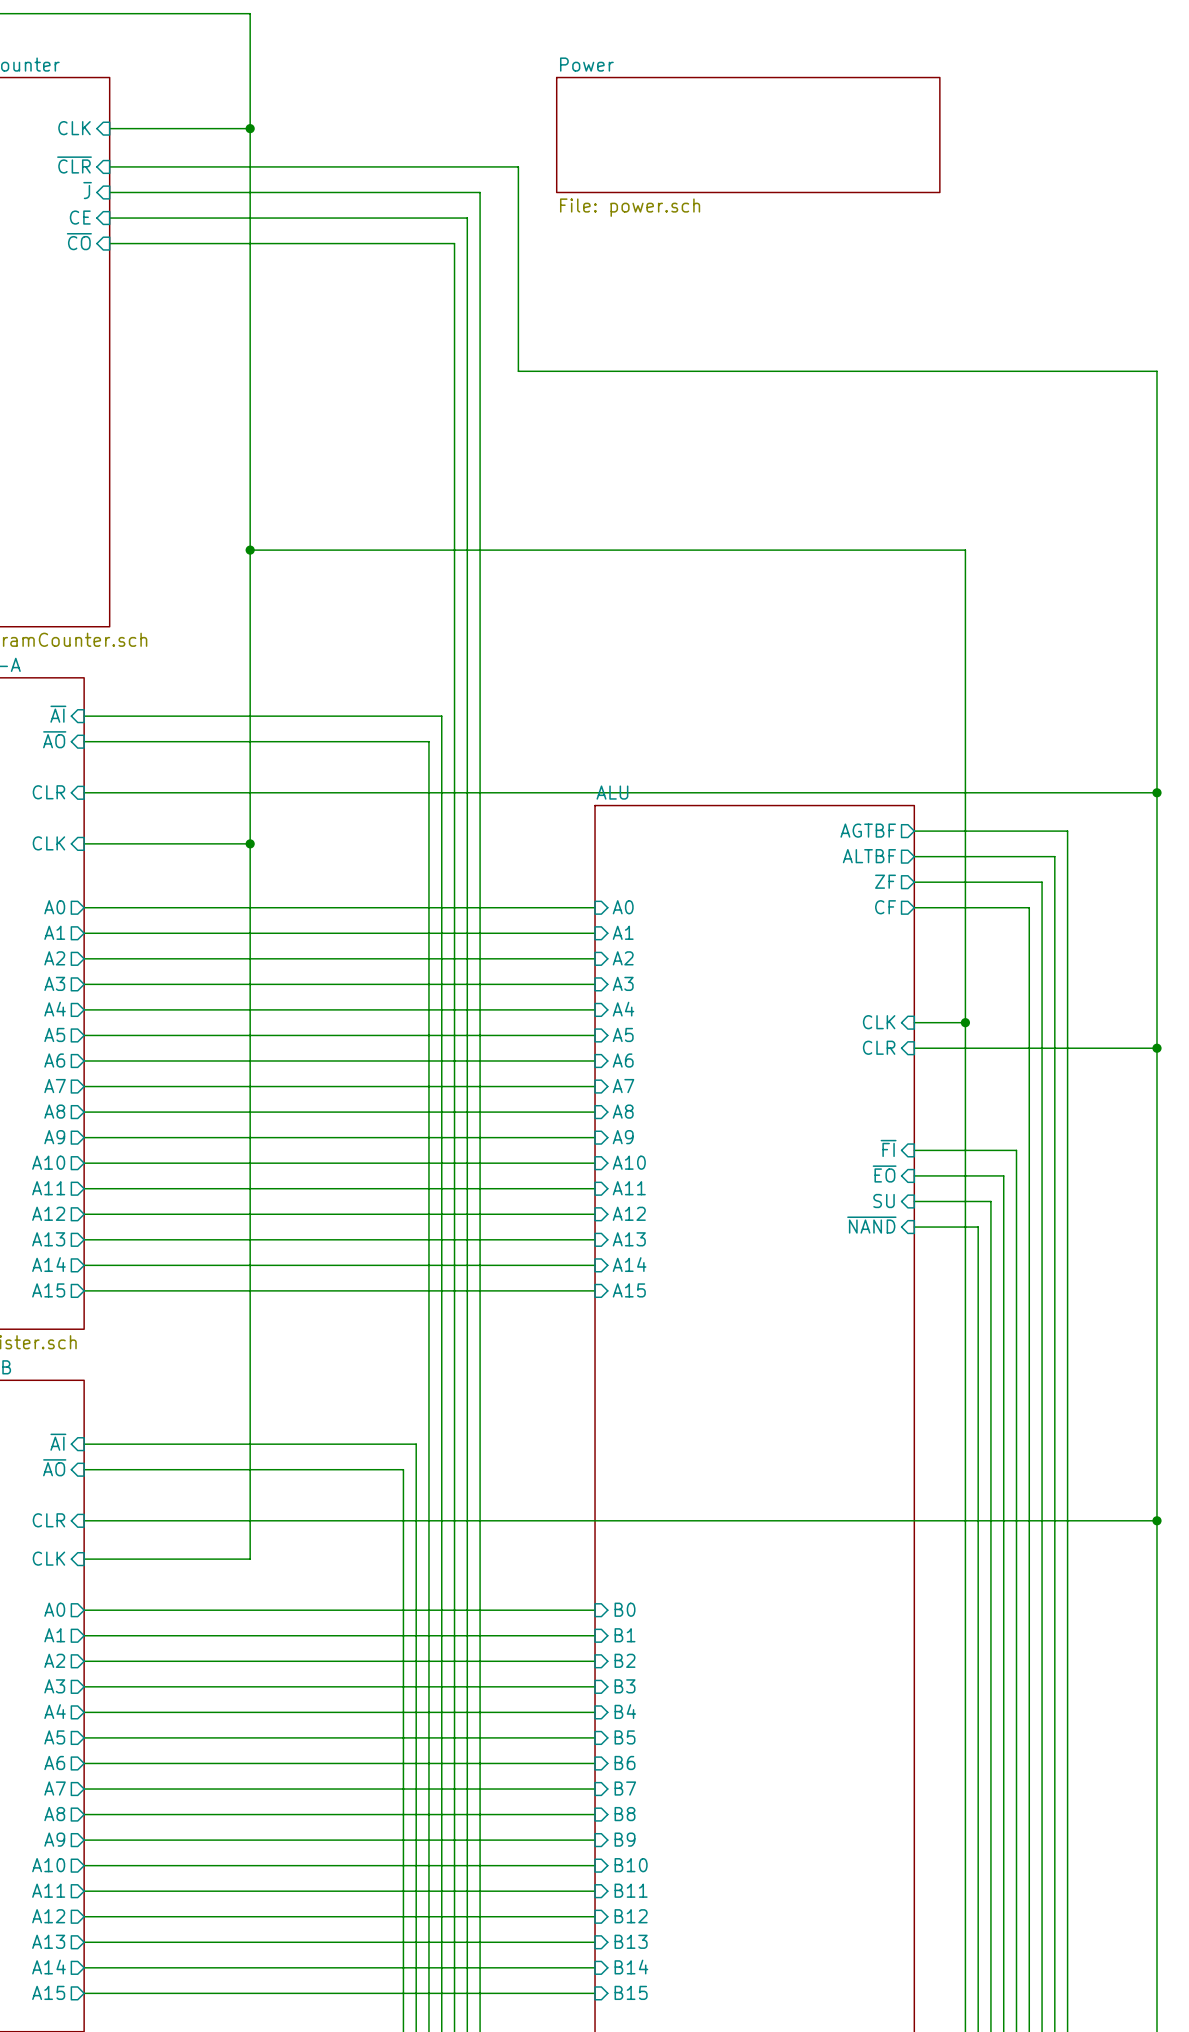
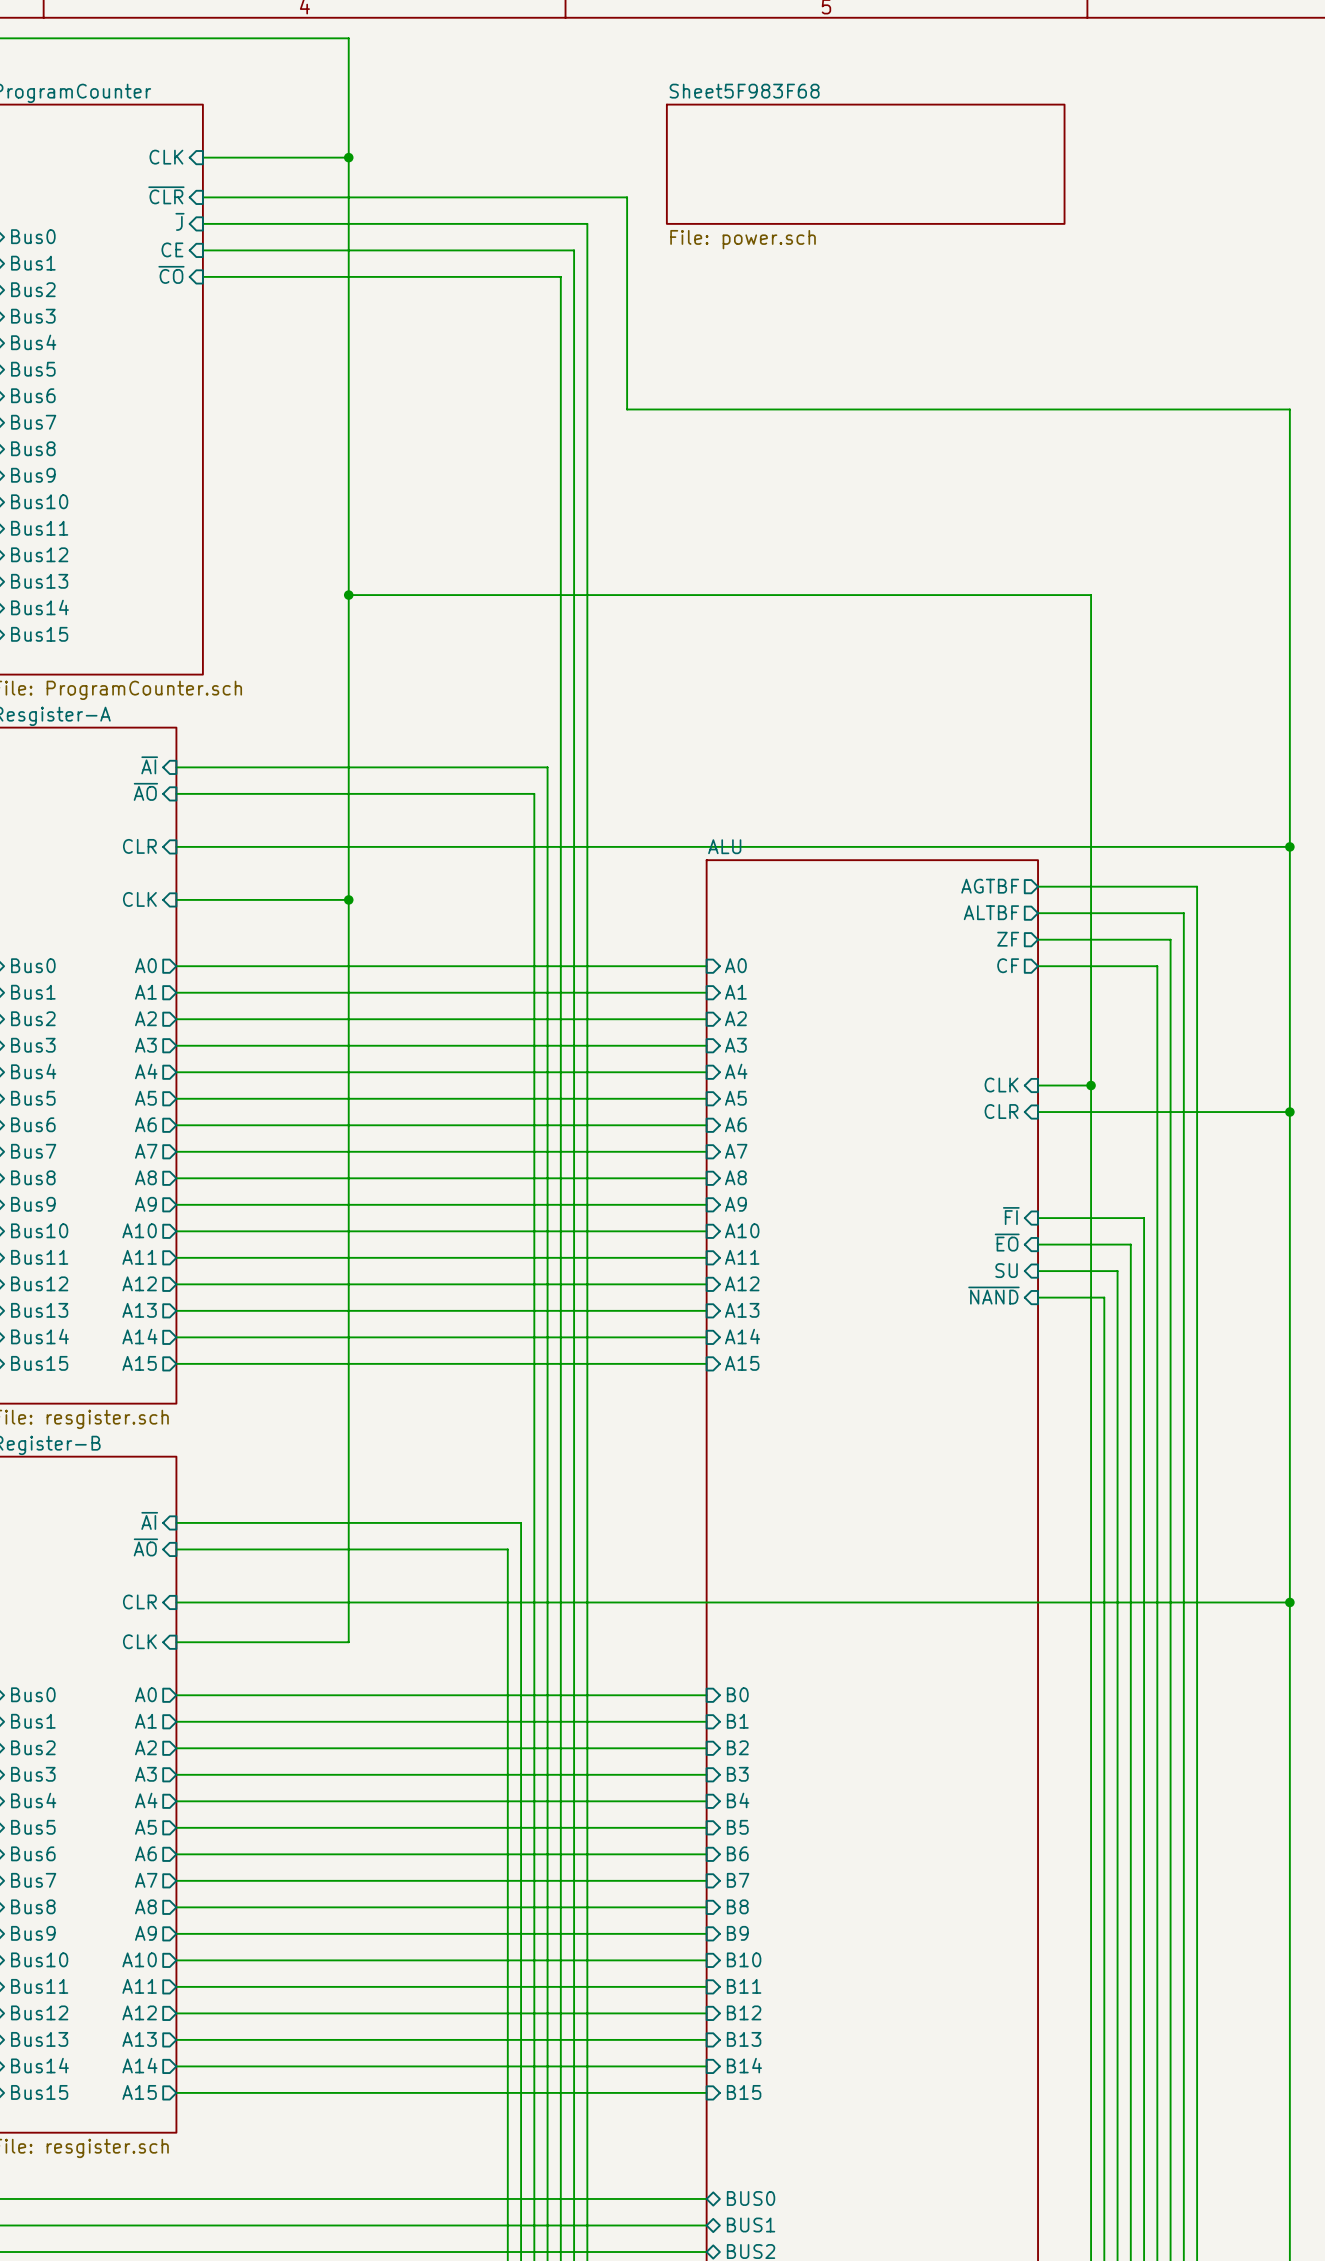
sheet Power name: Power (586, 64) -> Sheet5F983F68 (744, 91)

